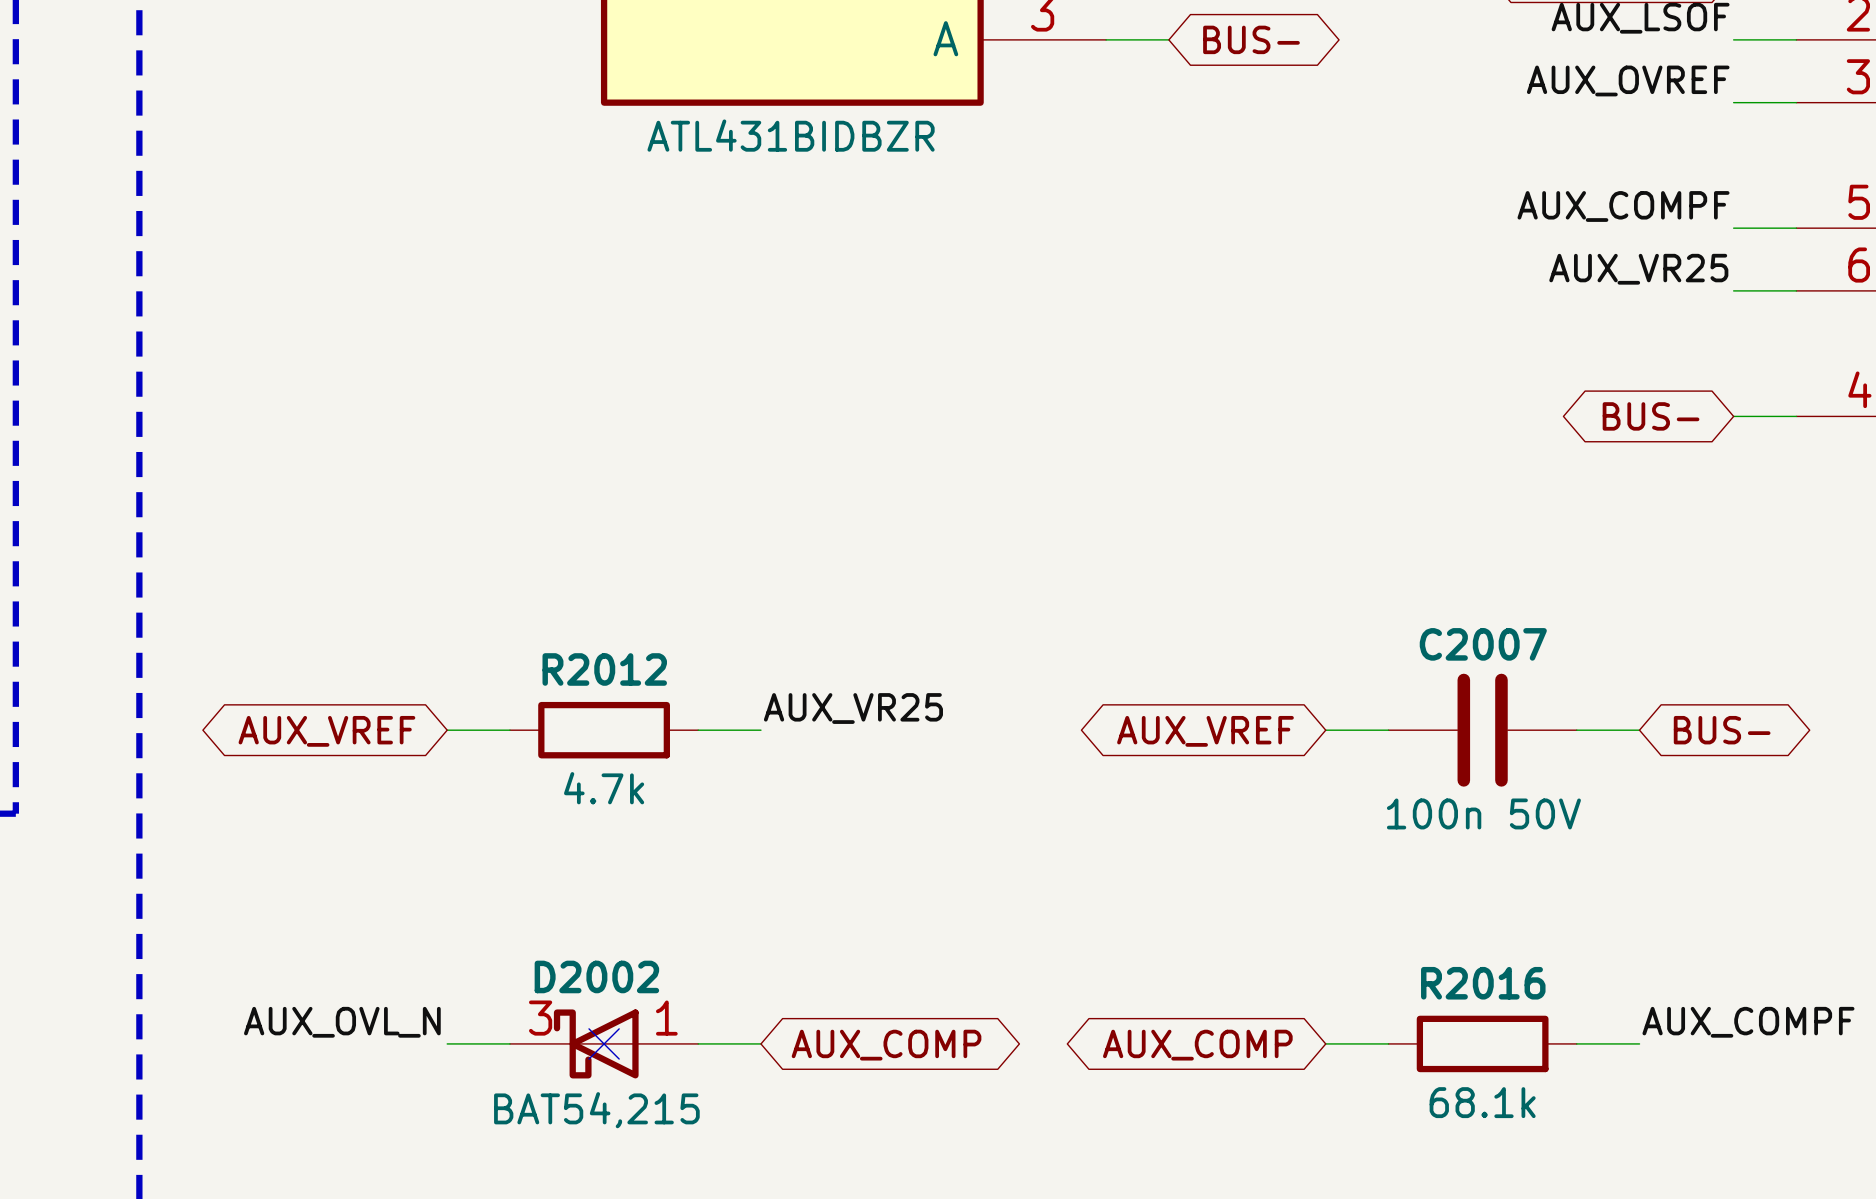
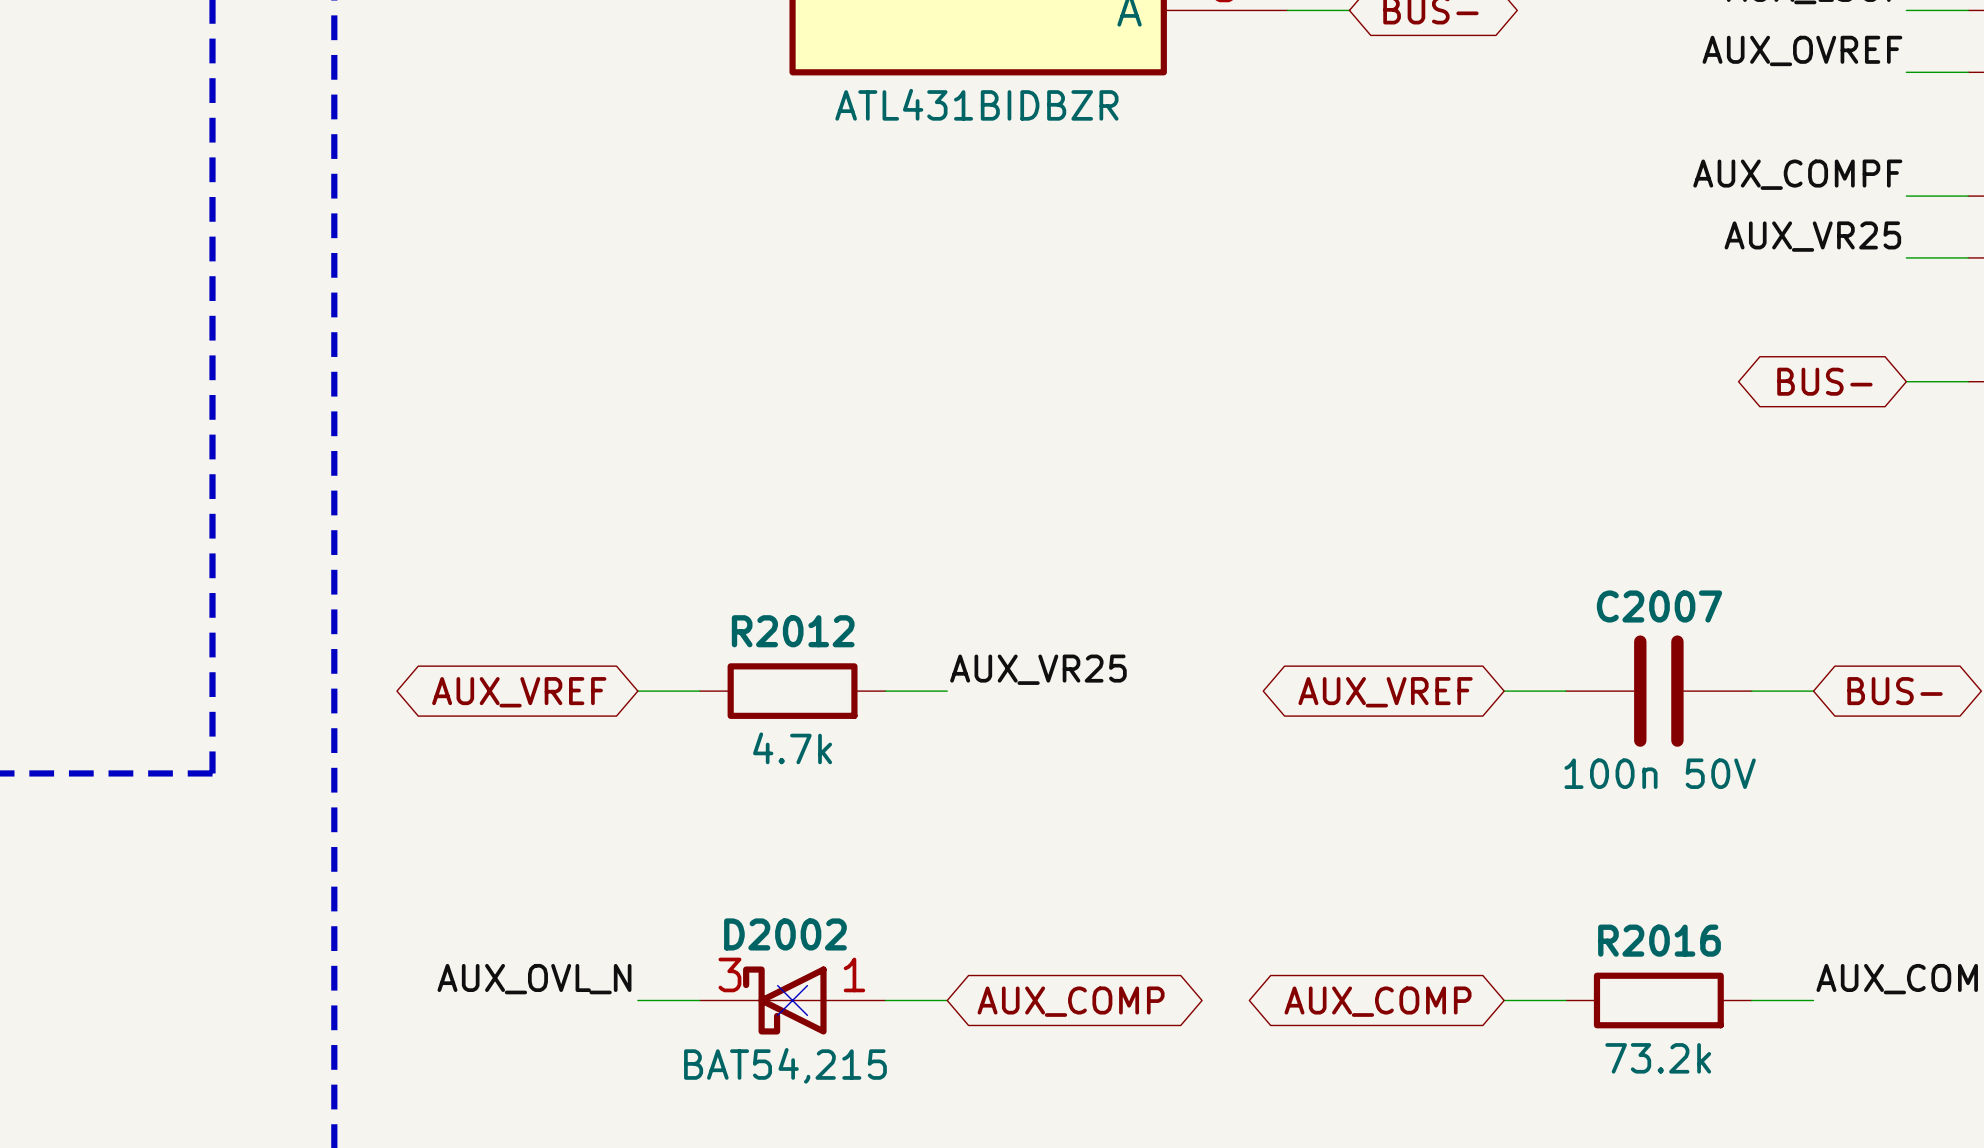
R2016 value: 68.1k (1482, 1102) -> 73.2k (1658, 1058)

